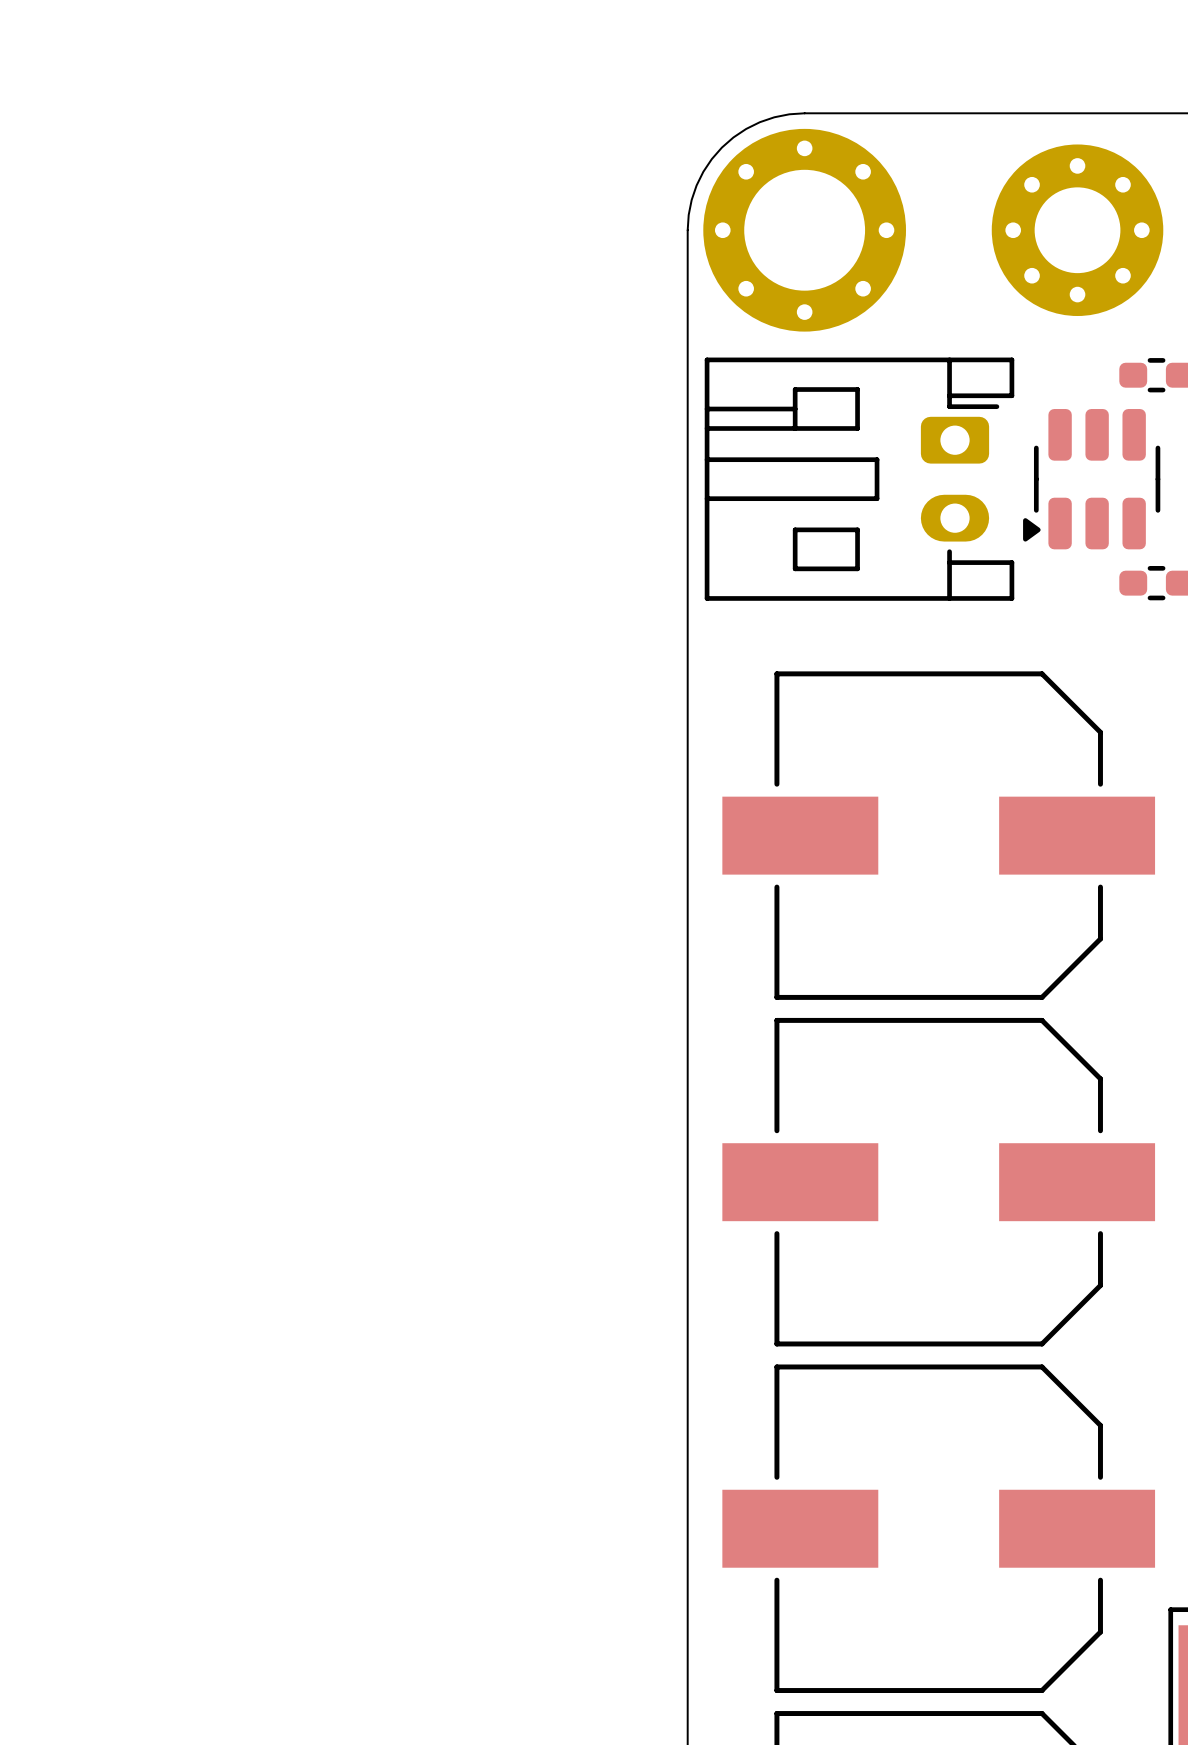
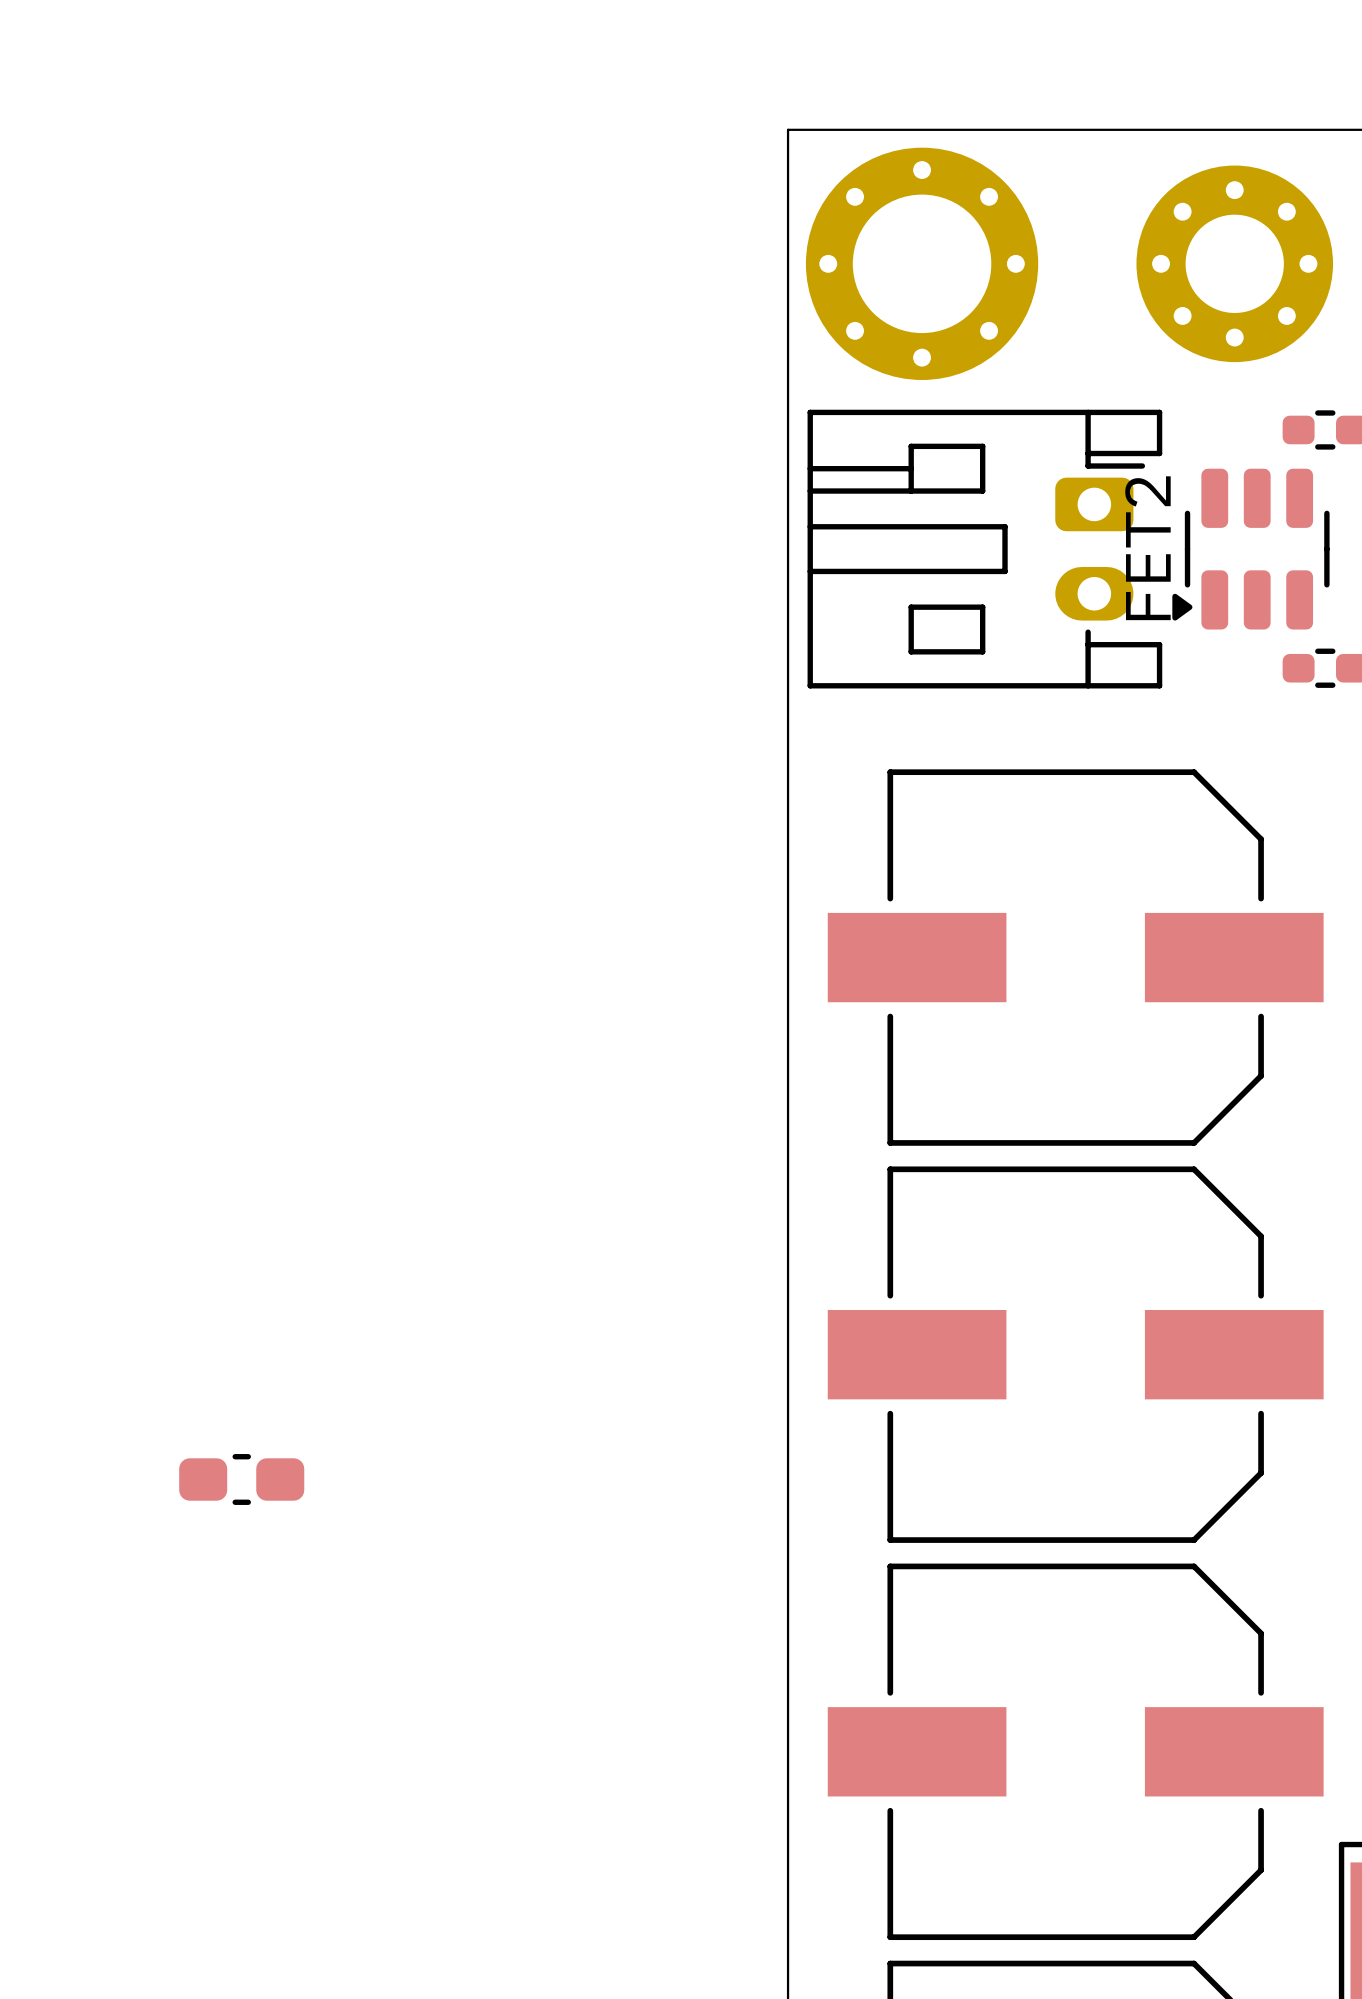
board edge: (804, 113) (774, 117) (759, 122) (733, 137) (721, 147) (703, 171) (696, 185) (691, 199) (687, 230) -> (922, 129) (788, 129) (788, 263)
FET2 name: none -> FET2 (1147, 548)
part: none -> (241, 1479)

